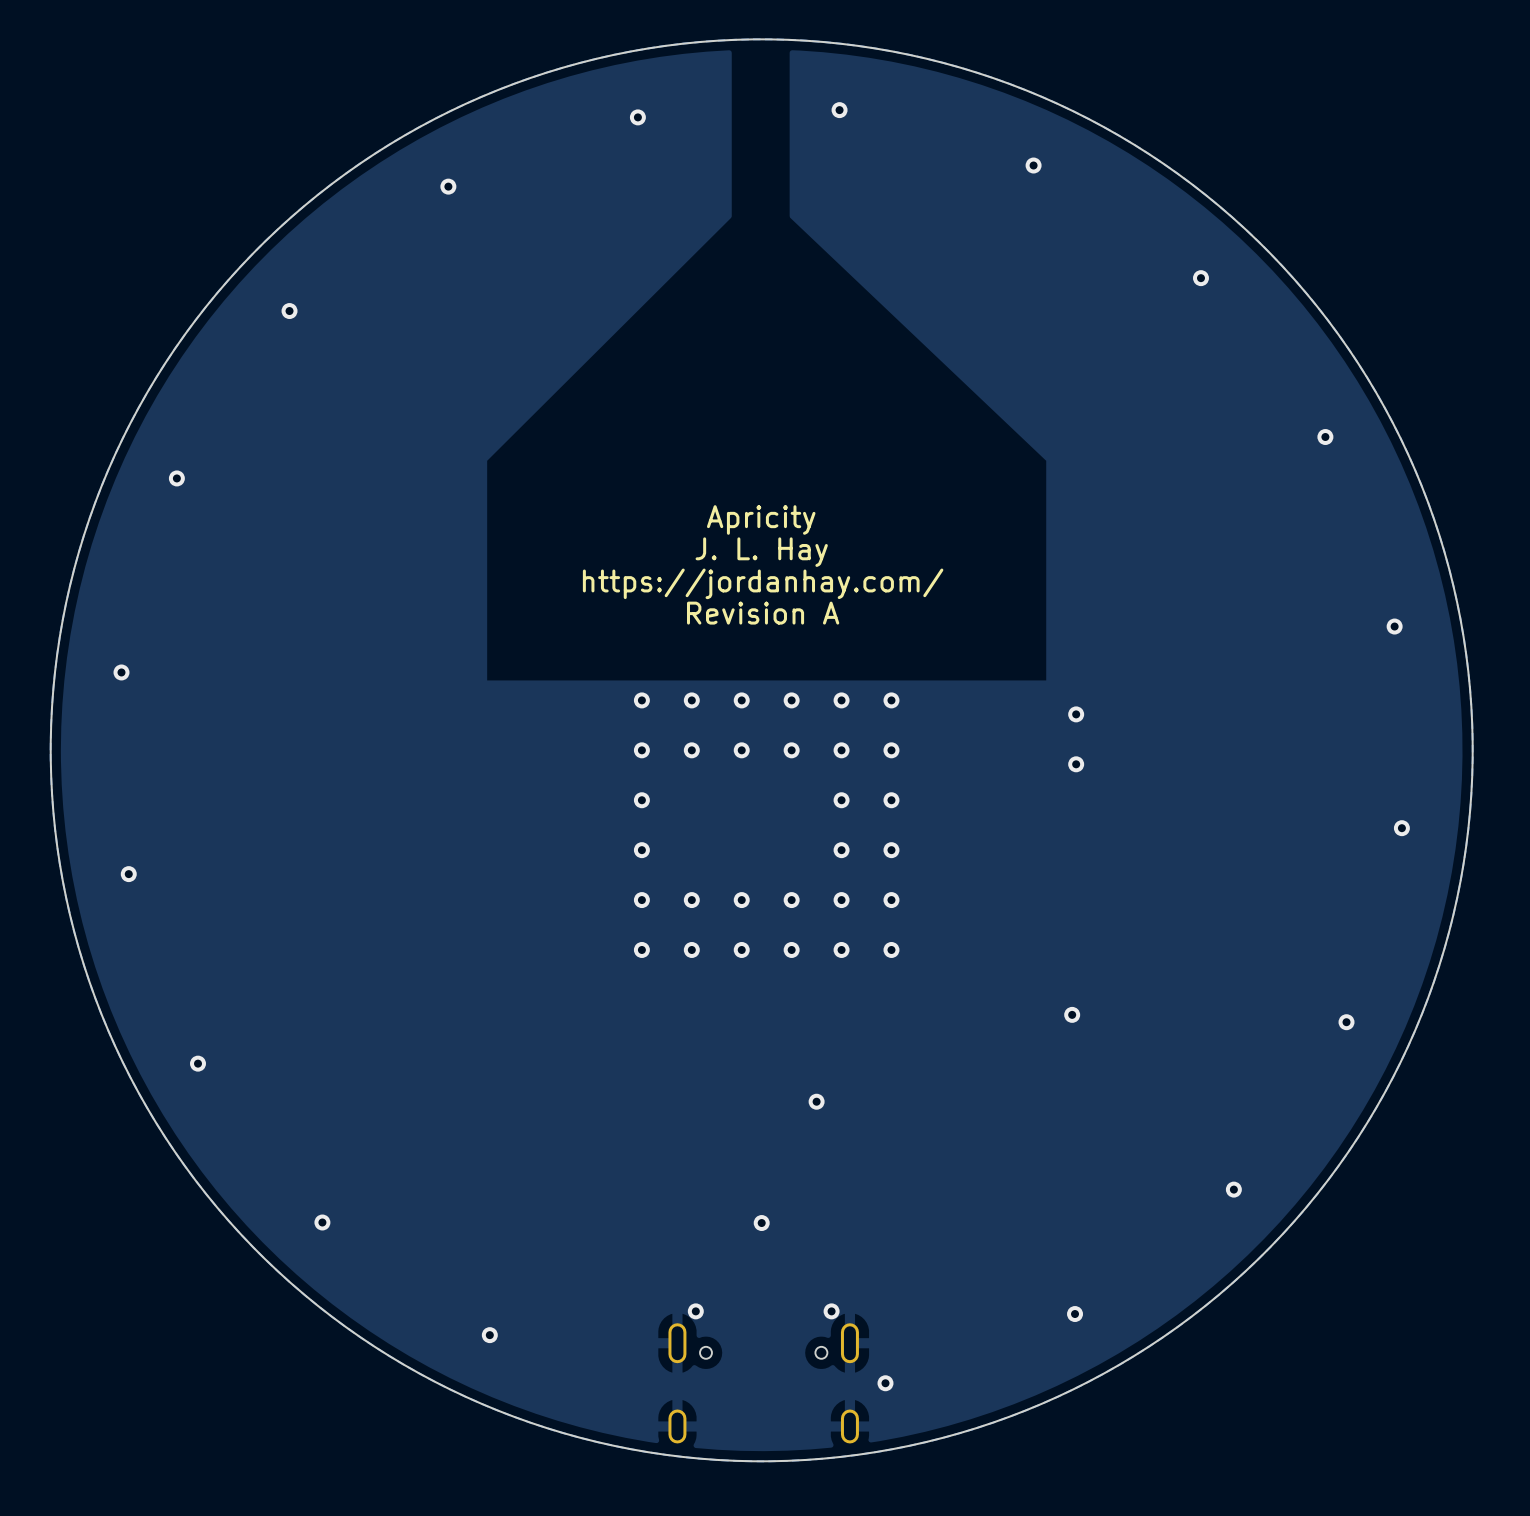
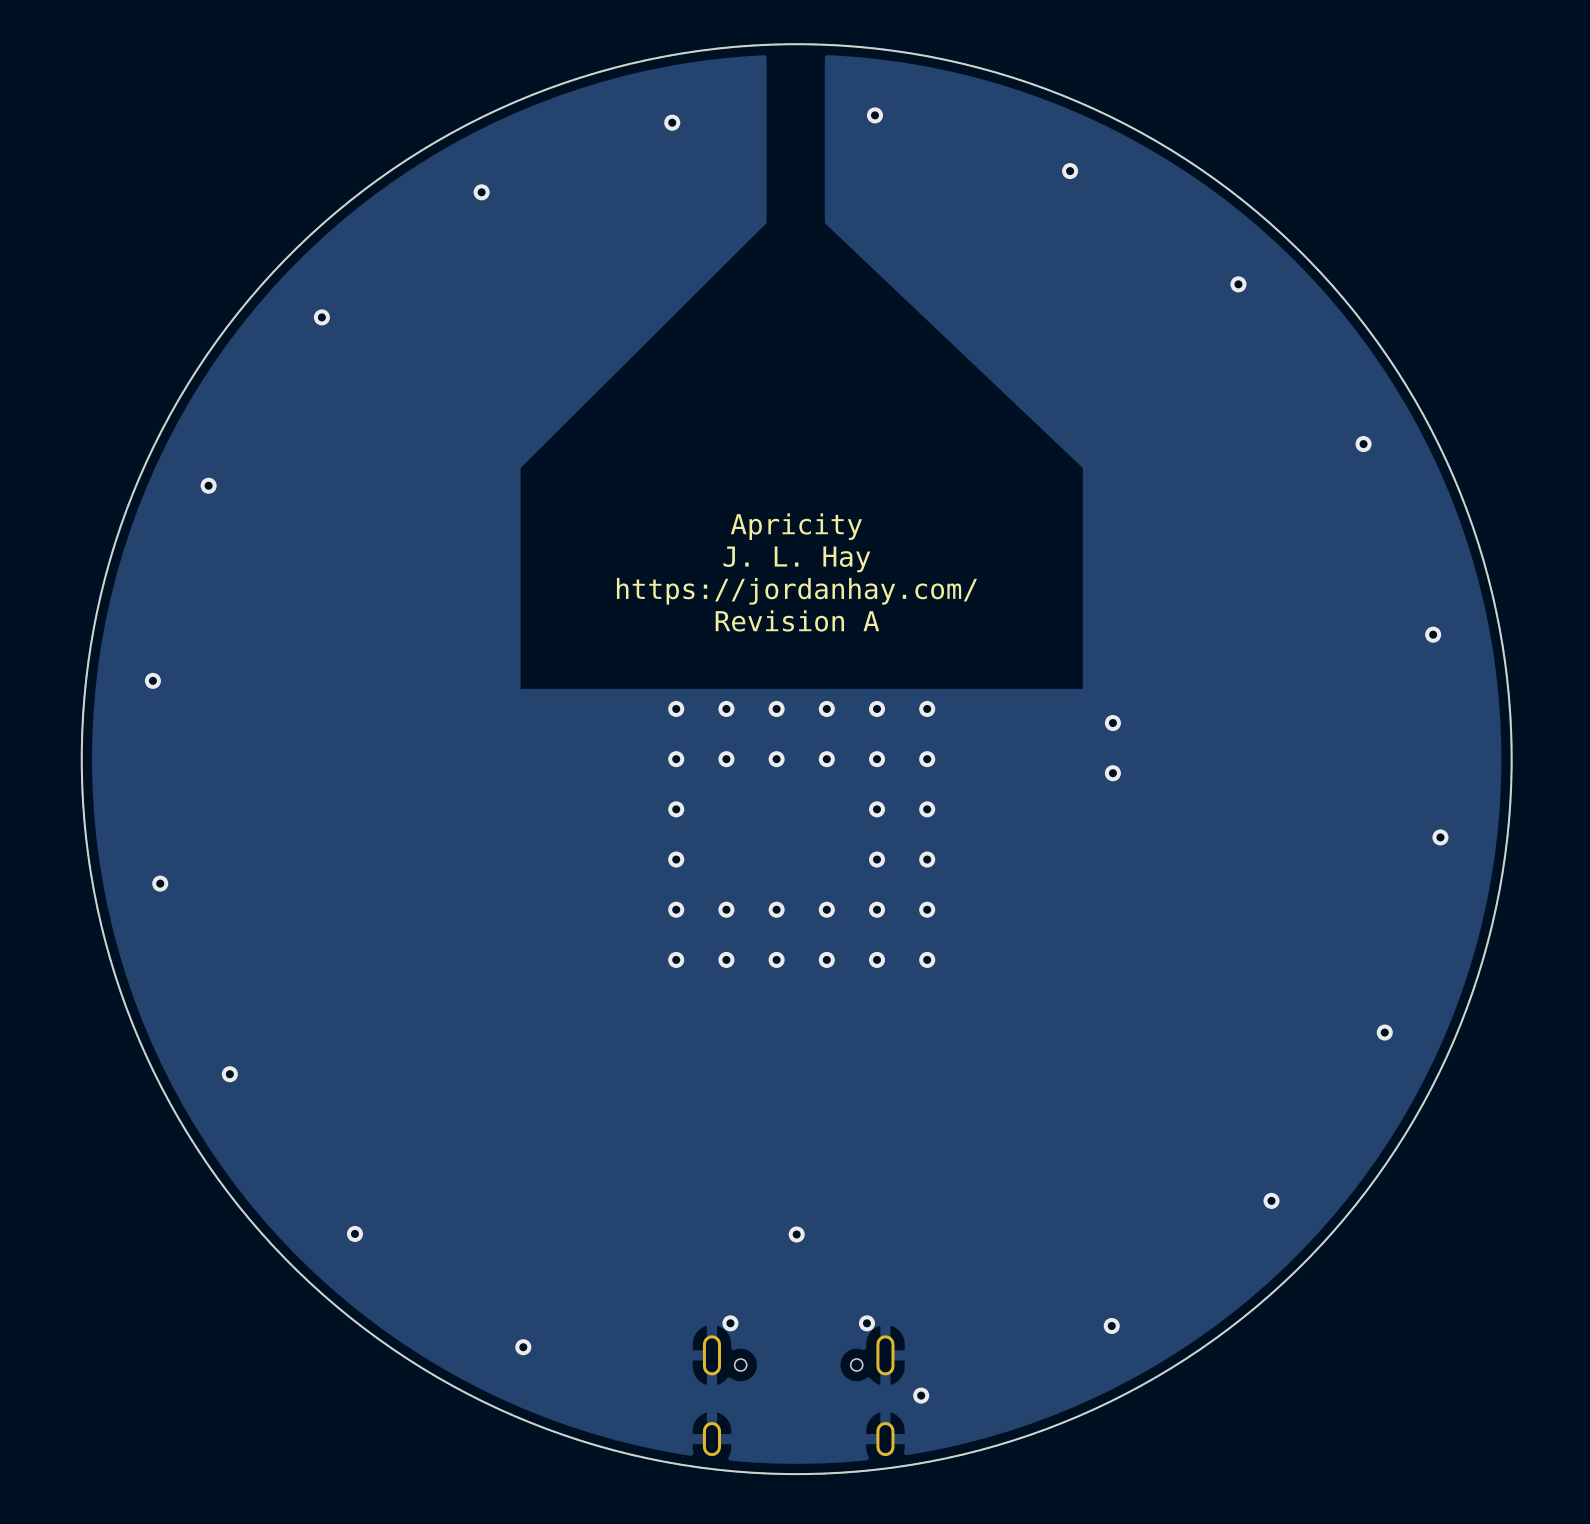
via: (1072, 1014) -> none
via: (816, 1101) -> none

